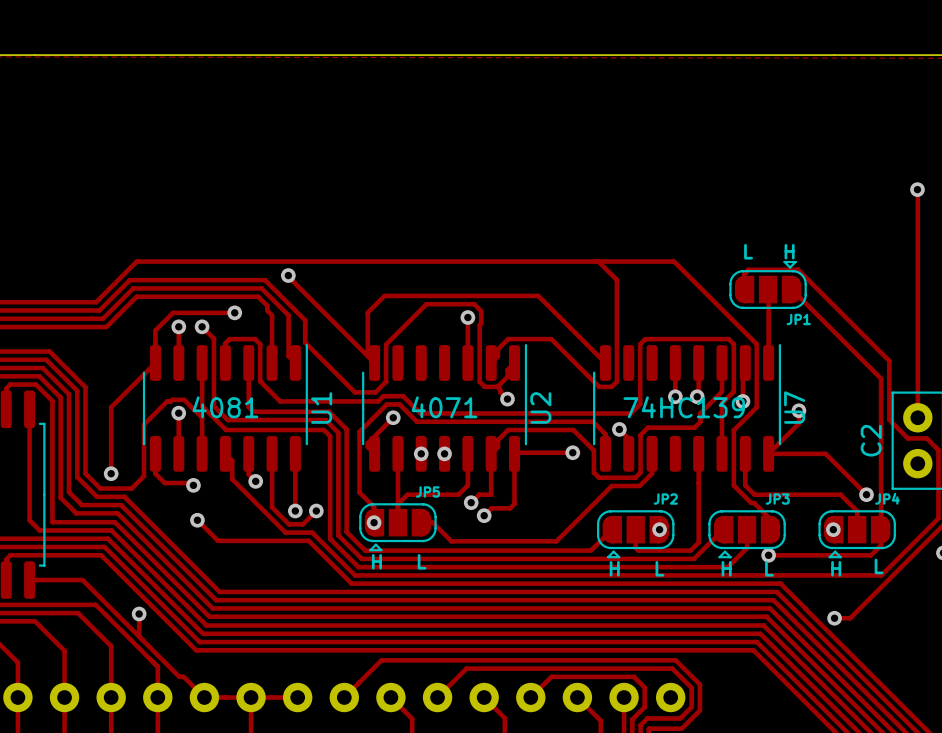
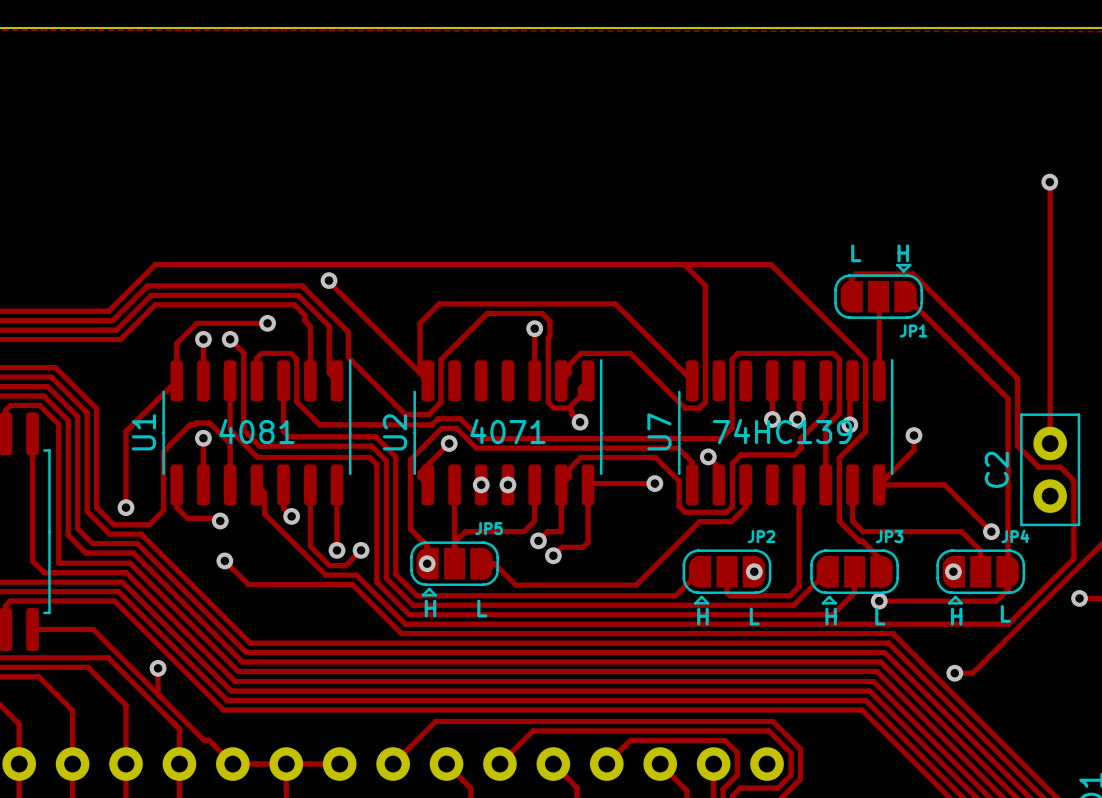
U1 name position: U1 (321, 407) -> U1 (143, 432)
U2 name position: U2 (540, 407) -> U2 (395, 432)
U7 name position: U7 (794, 407) -> U7 (659, 431)

